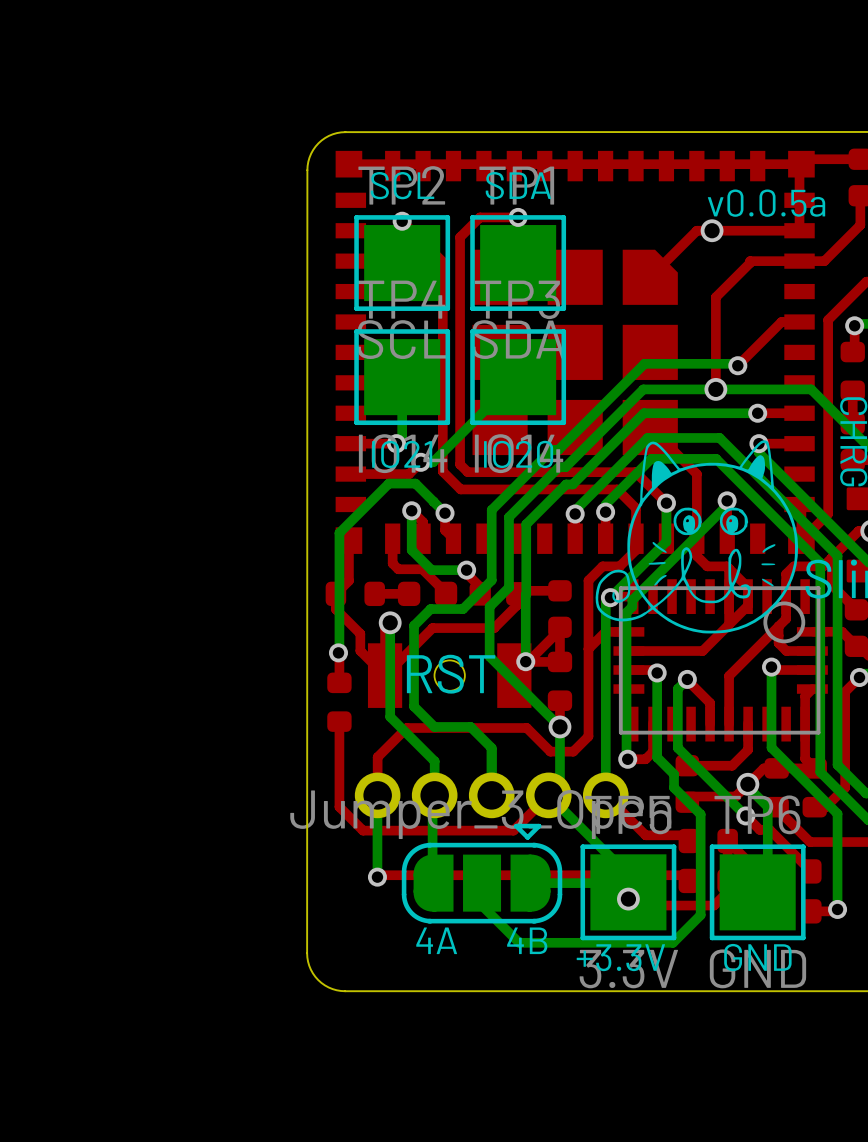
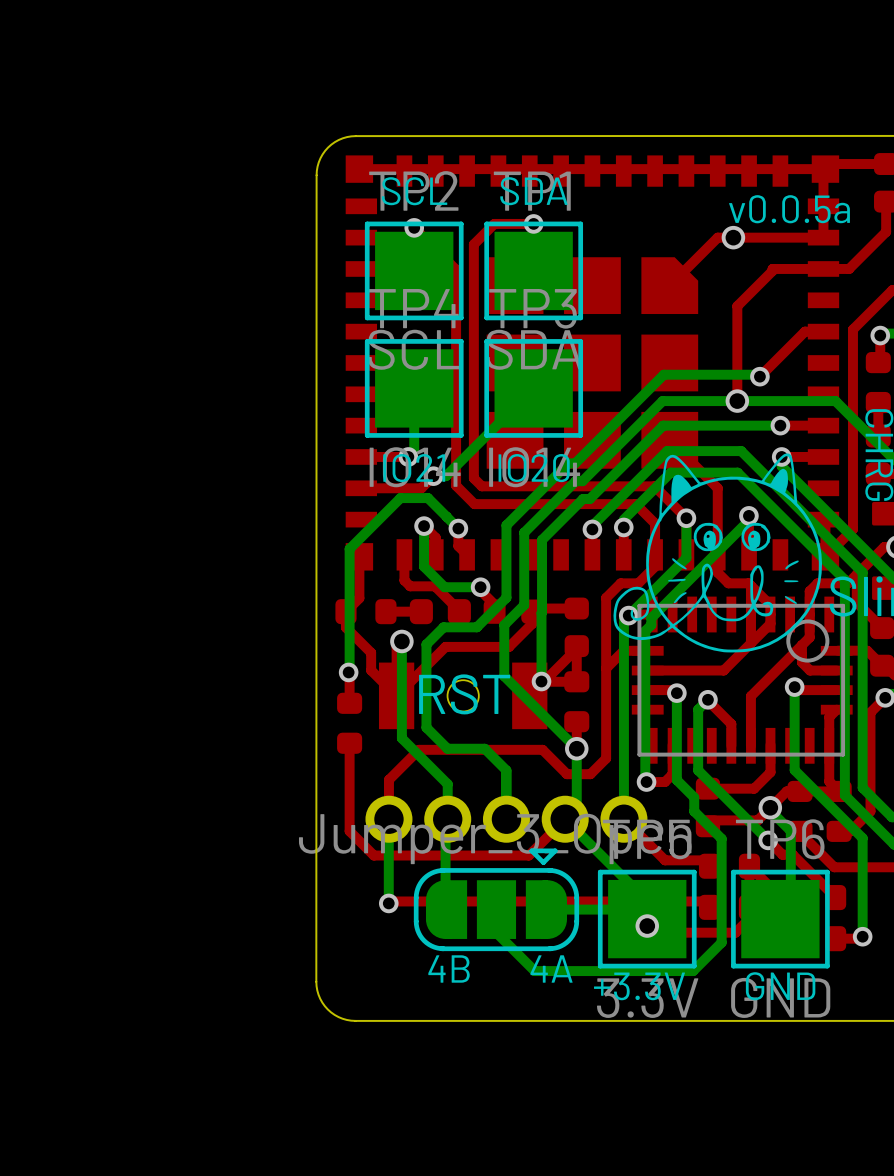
text: 4A (436, 940) -> 4B (449, 968)
text: 4B (527, 940) -> 4A (551, 968)

